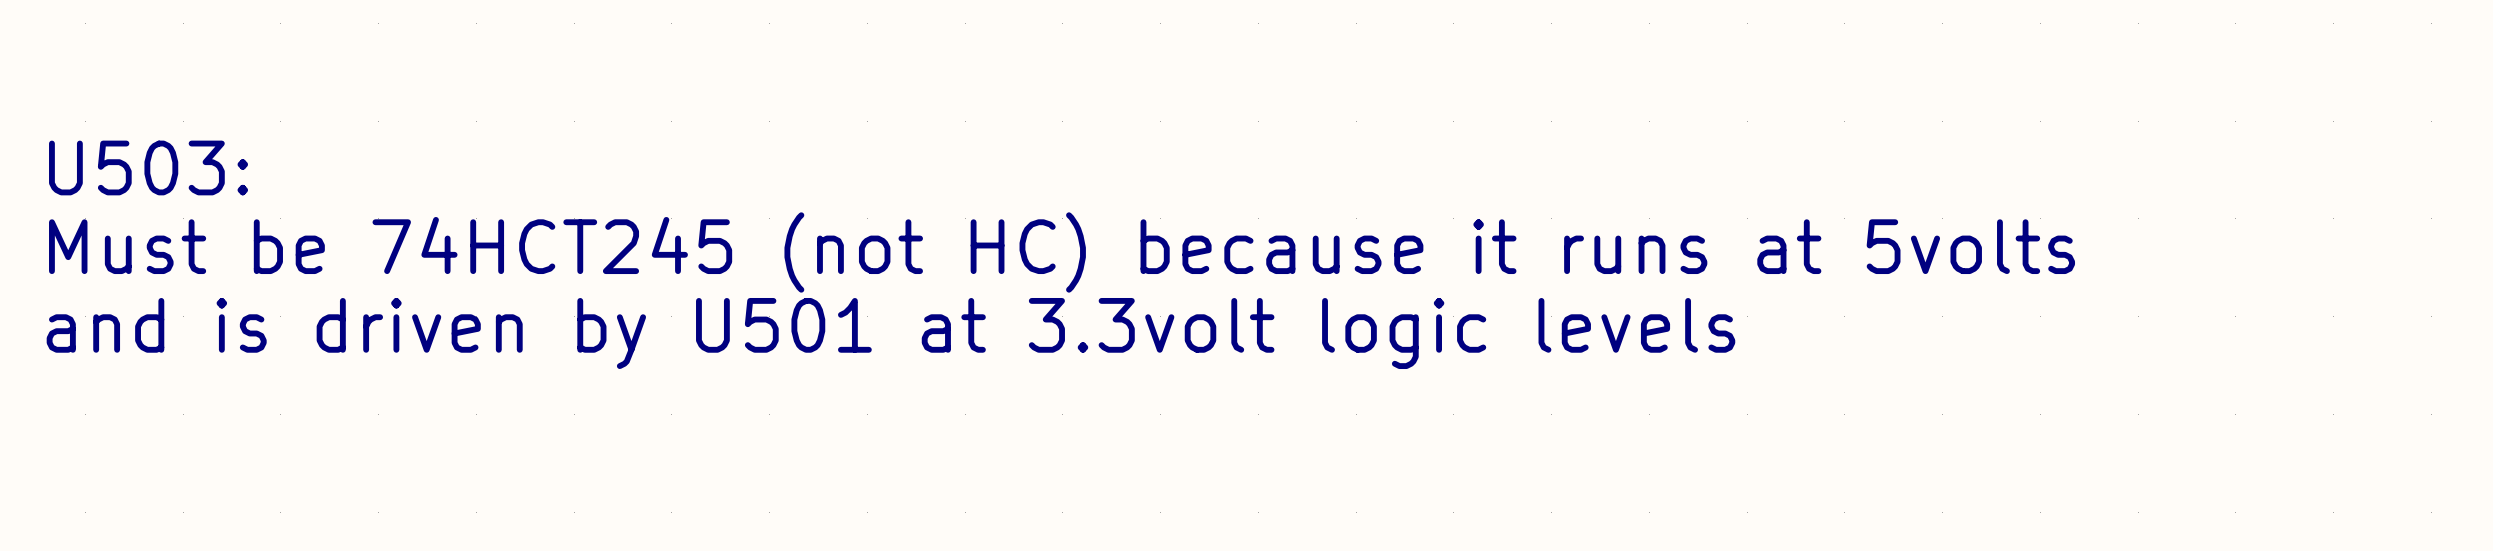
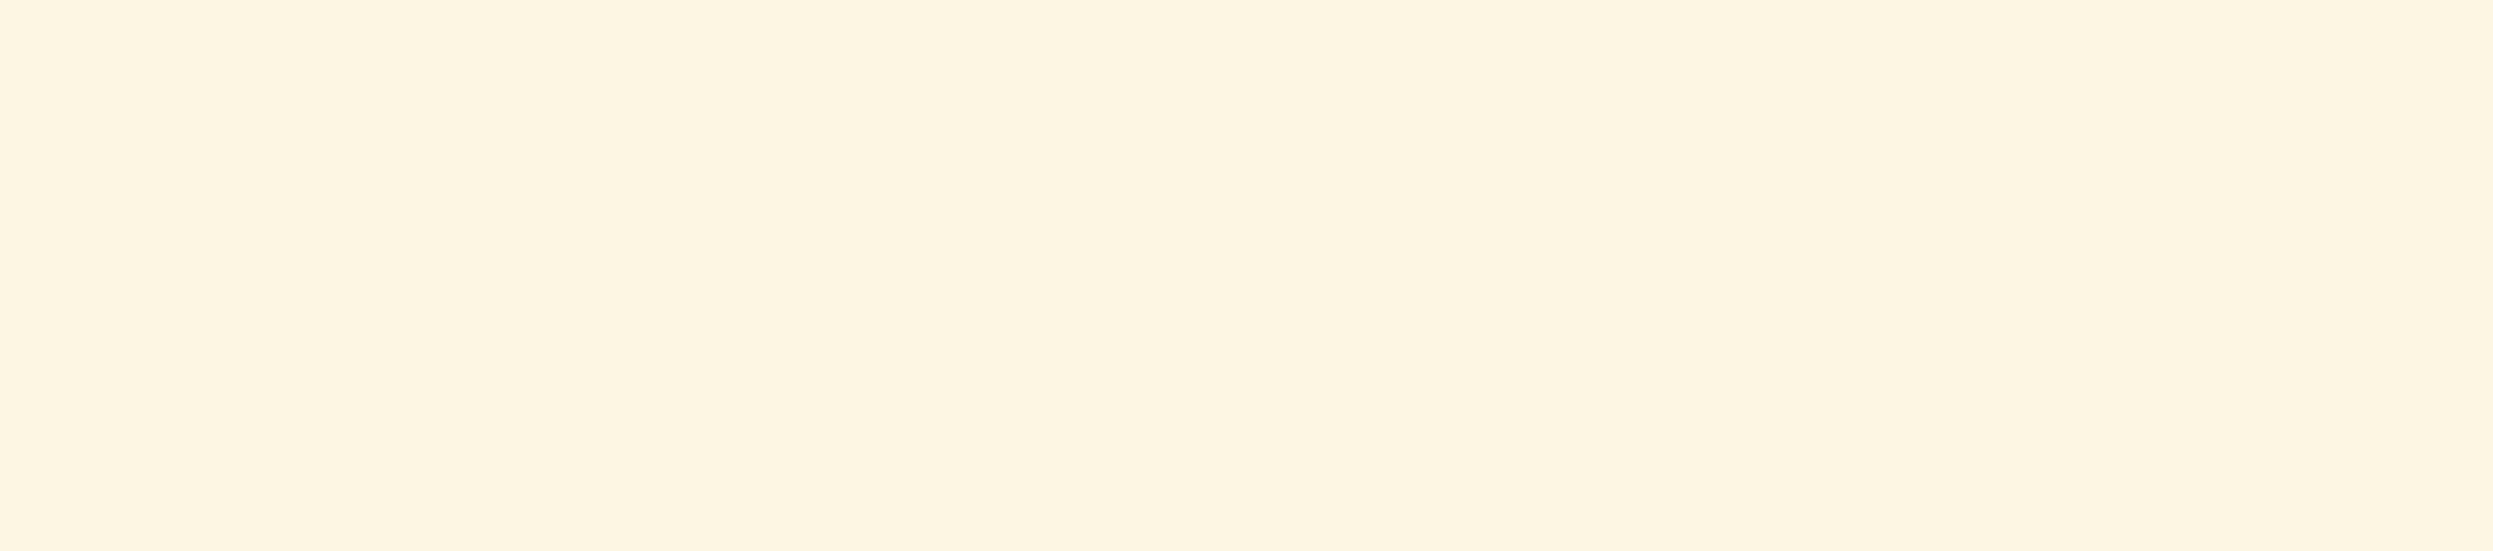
text: U503: (148, 167) -> none
text: Must be 74HCT245 (not HC) because it runs at 5volts (1062, 252) -> none
text: and is driven by U501 at 3.3volt logic levels (890, 333) -> none

